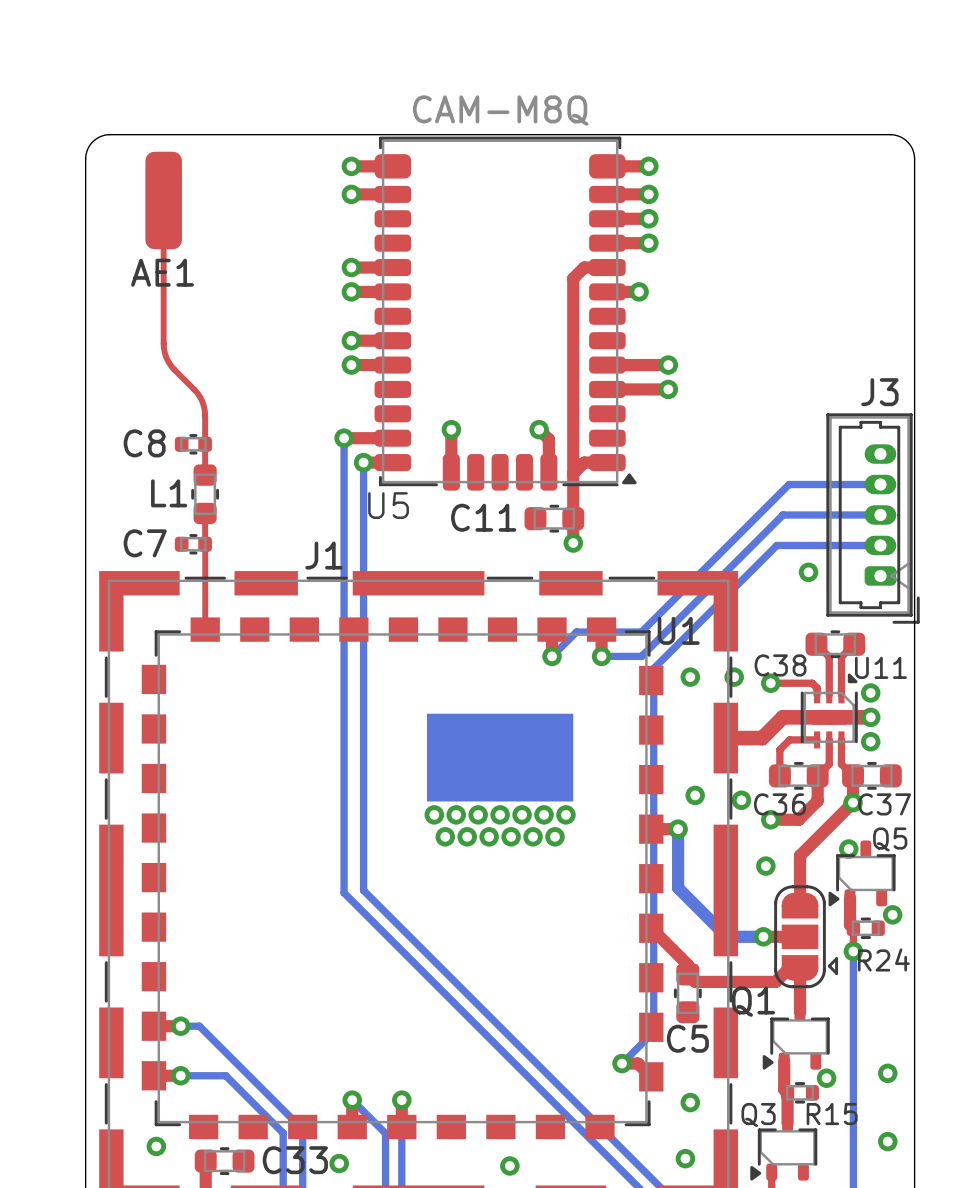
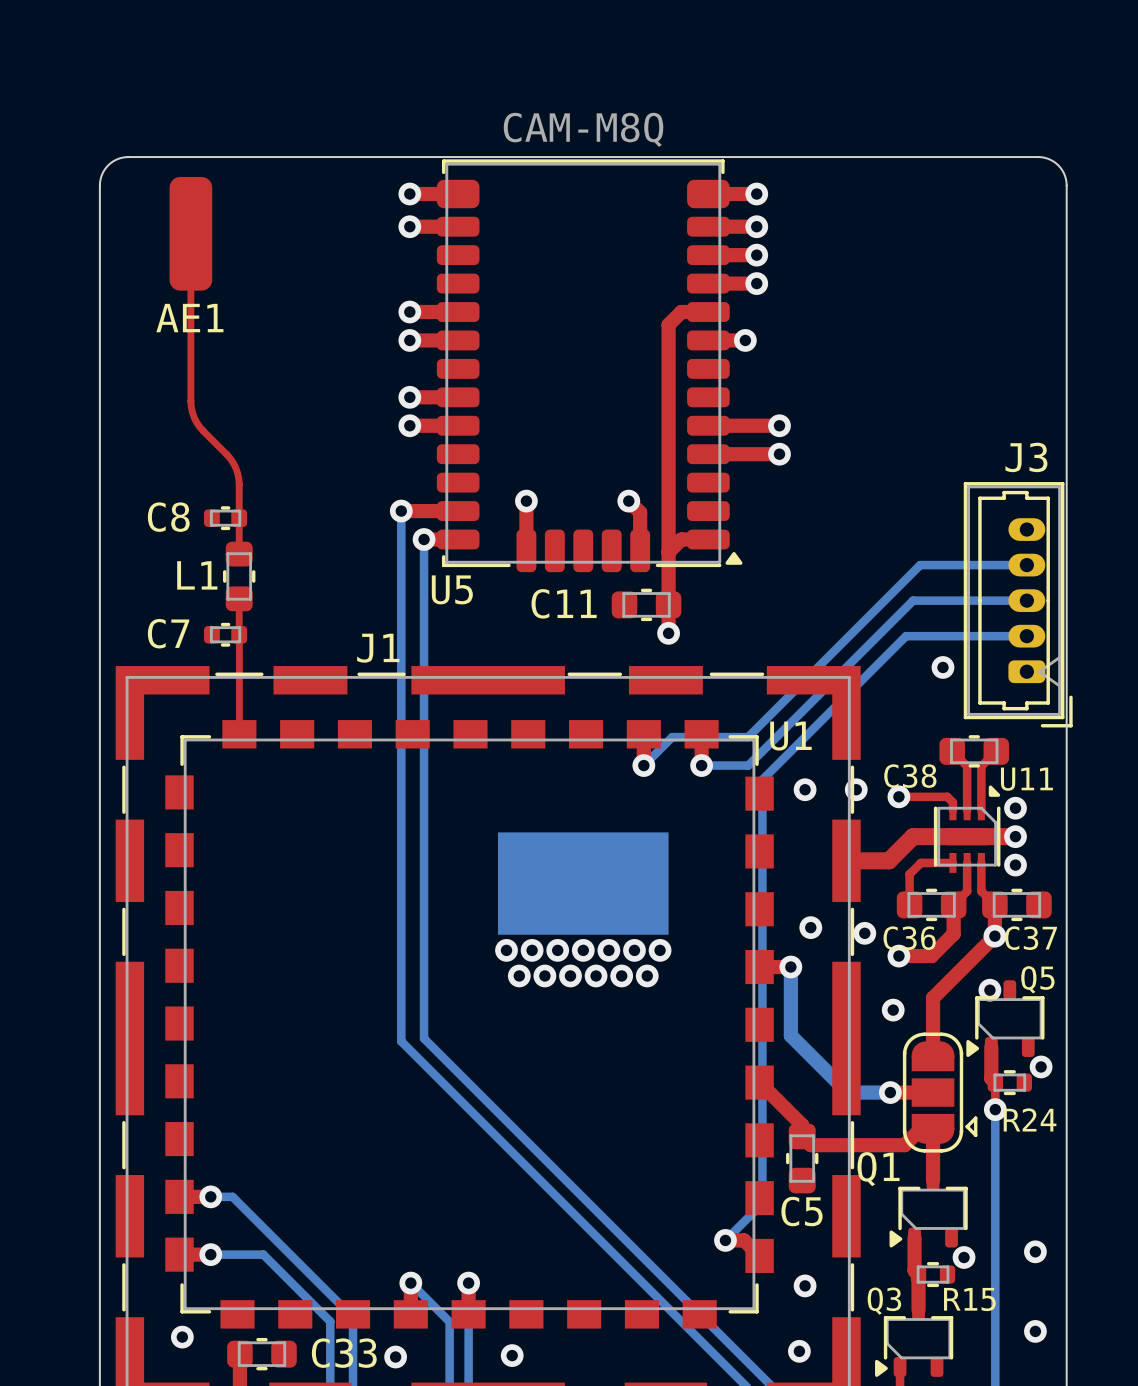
via position: (509, 1165) -> (512, 1355)

